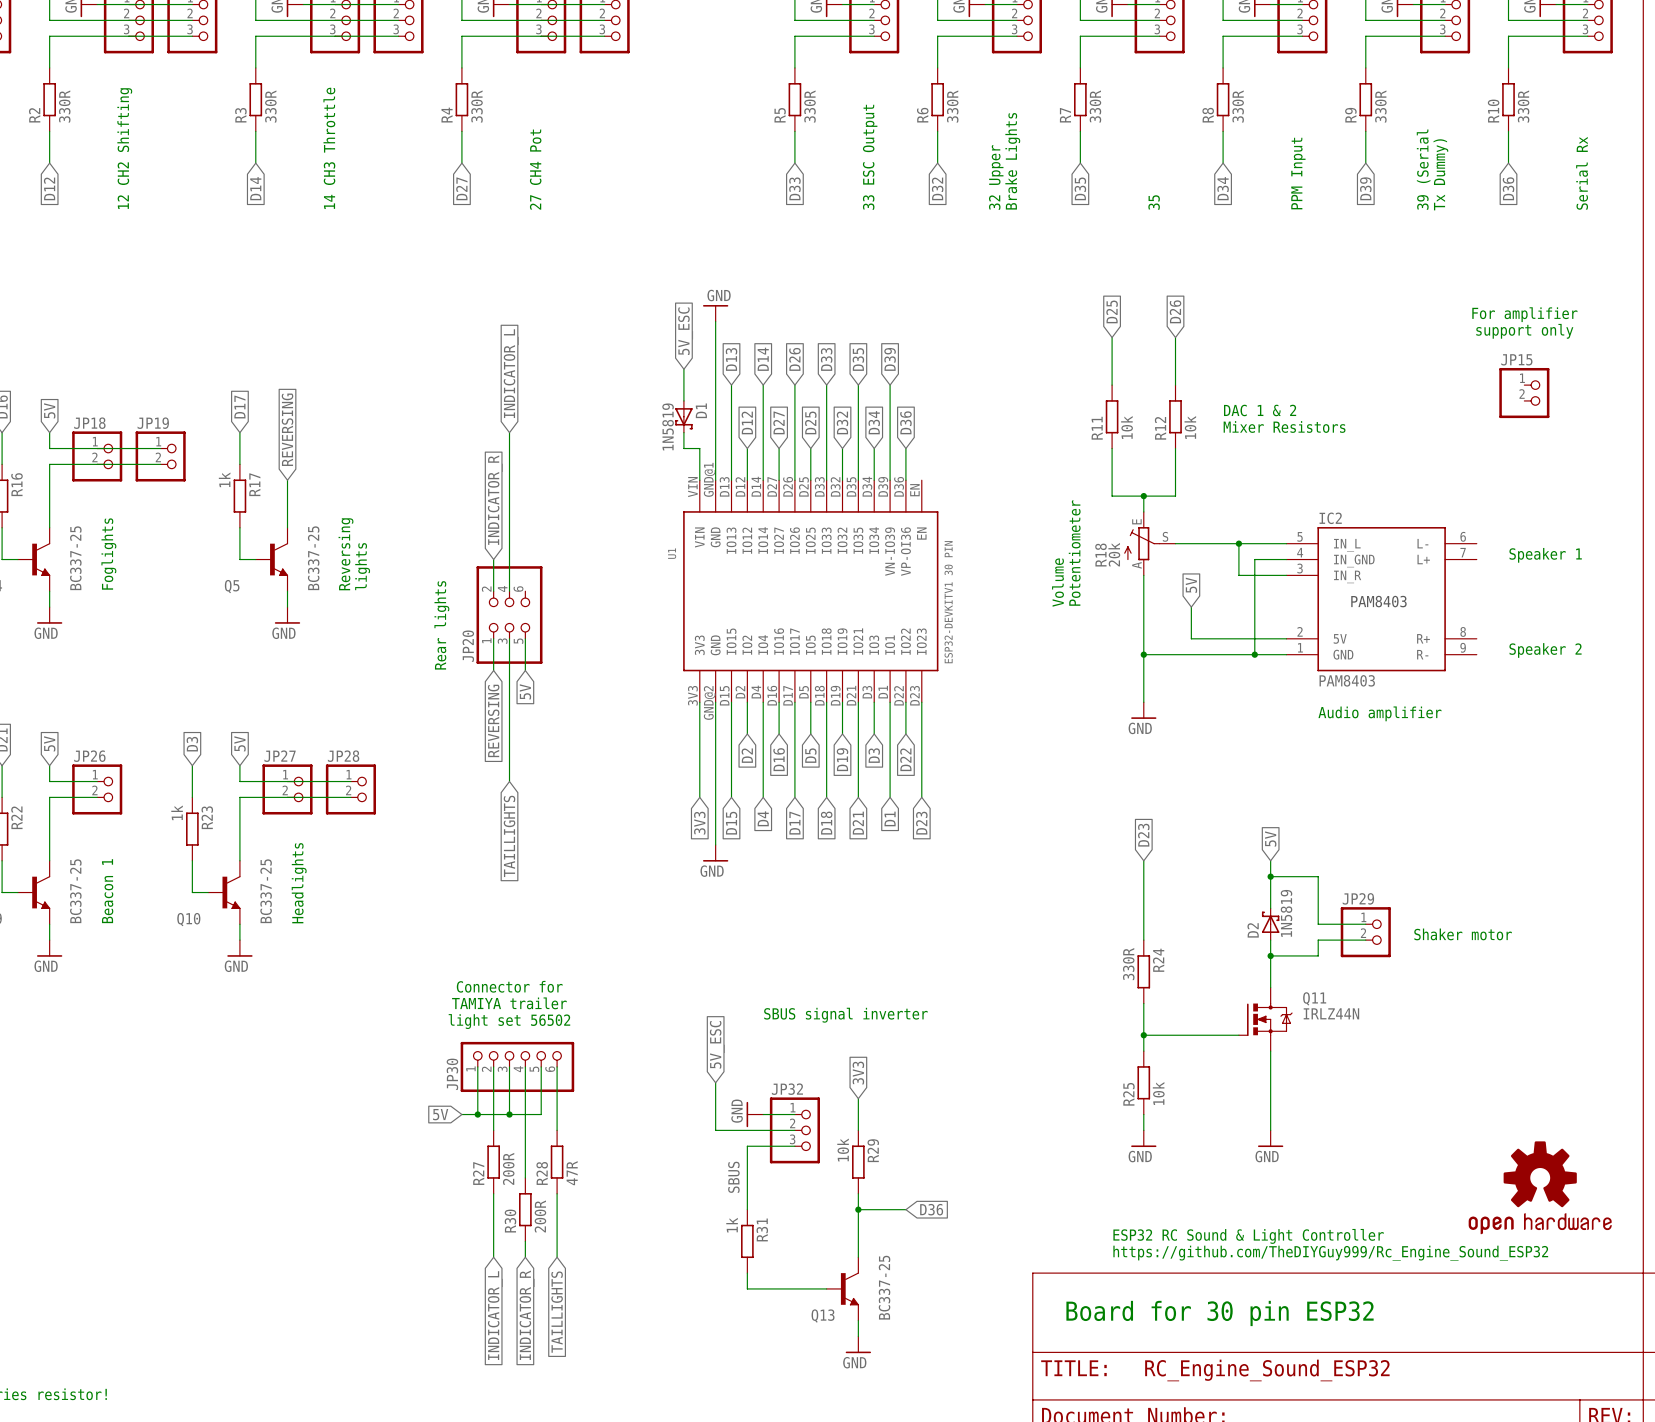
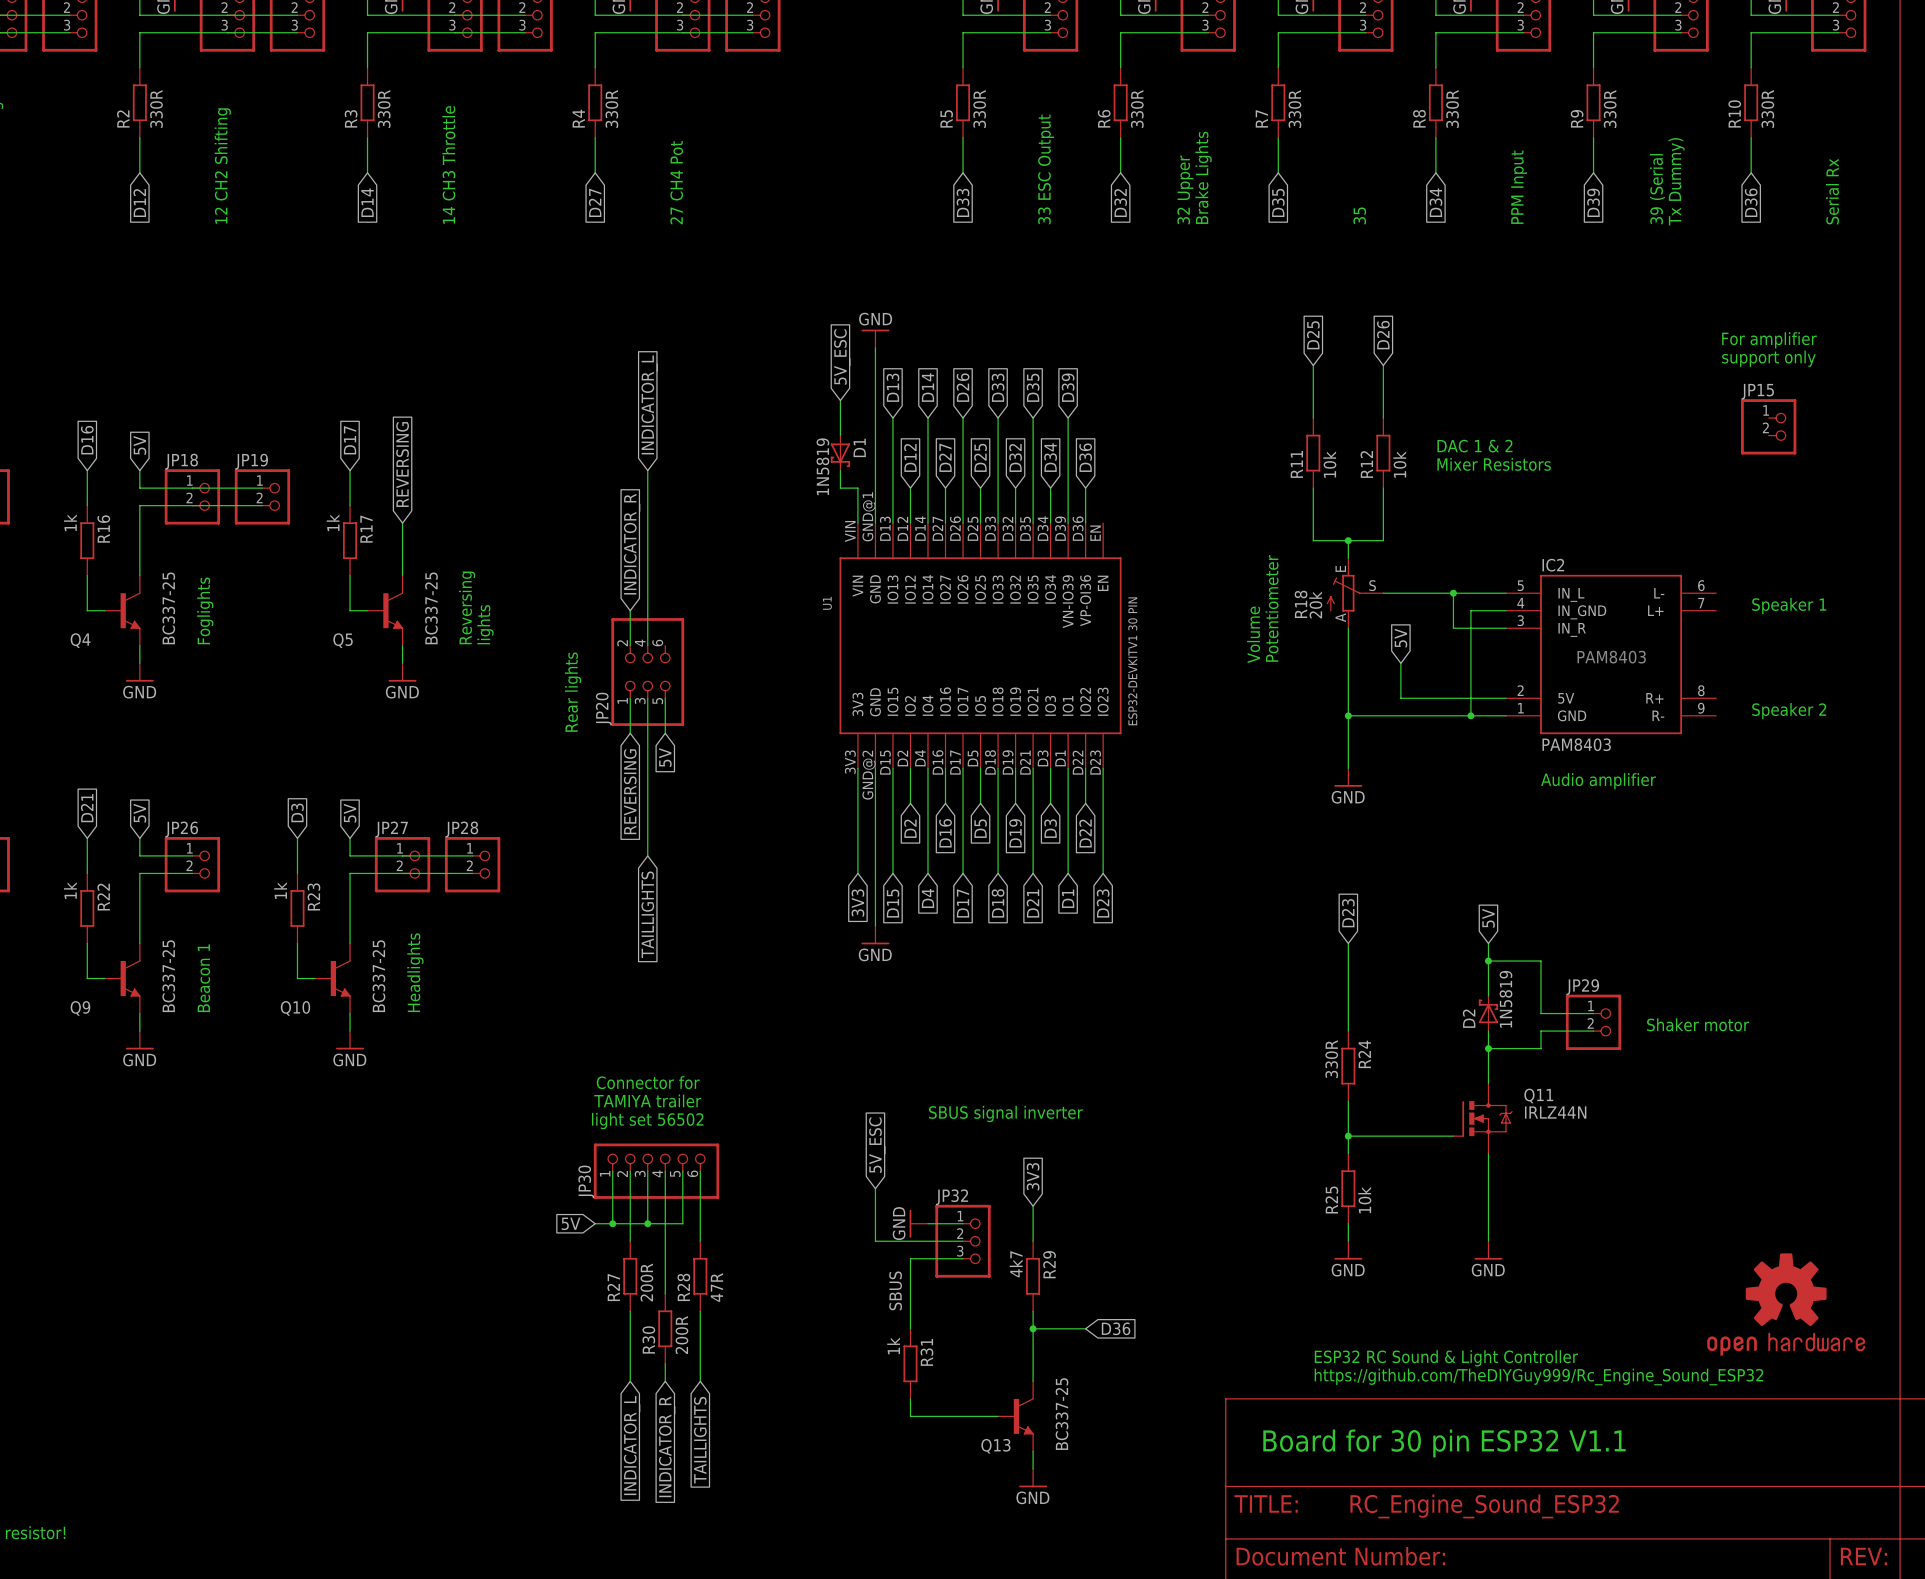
R29 value: 10k (843, 1149) -> 4k7 (1016, 1264)
text: Board for 30 pin ESP32 (1220, 1313) -> Board for 30 pin ESP32 V1.1 (1444, 1443)

